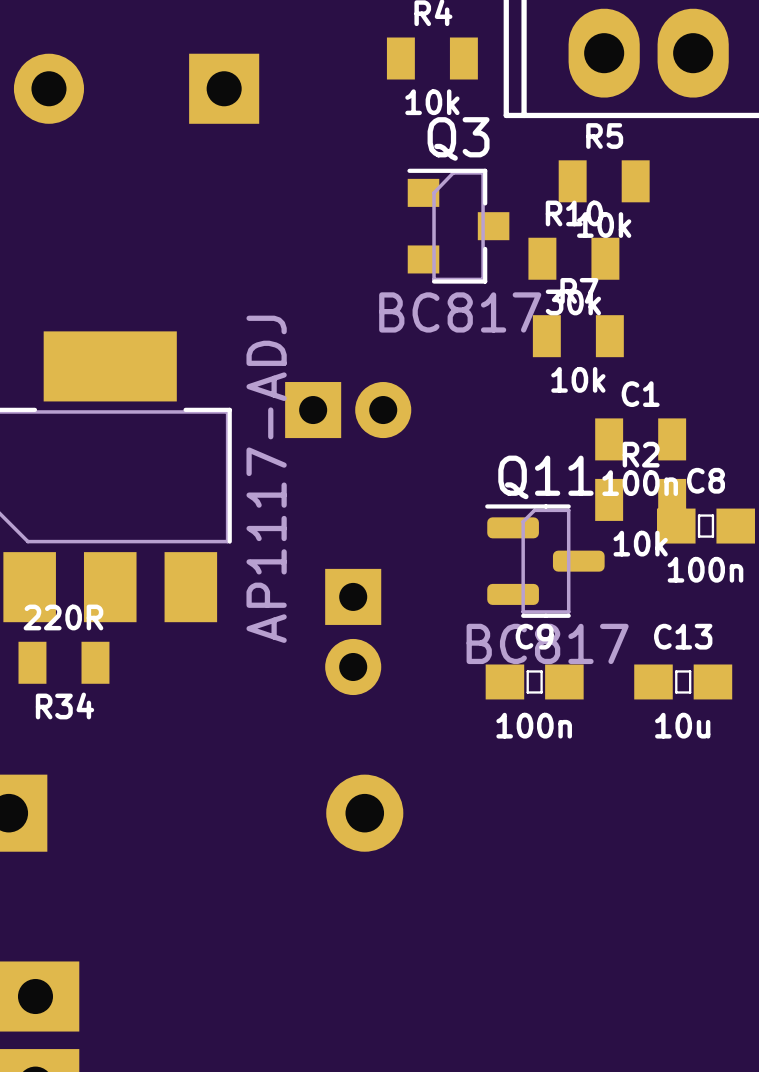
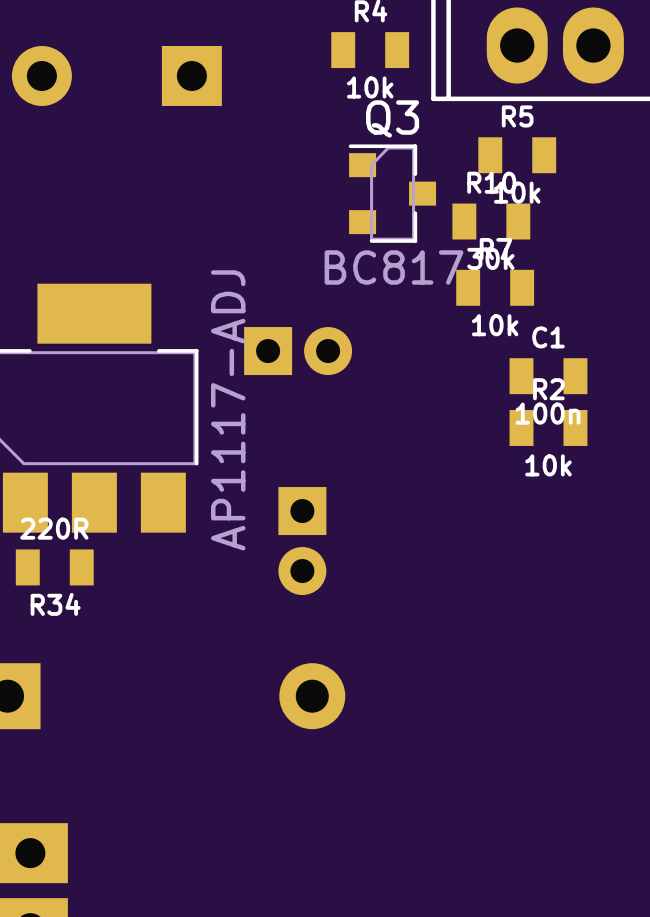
C8: 100n (705, 526) -> none
Q11: BC817 (544, 561) -> none
C9: 100n (534, 681) -> none
C13: 10u (683, 681) -> none

